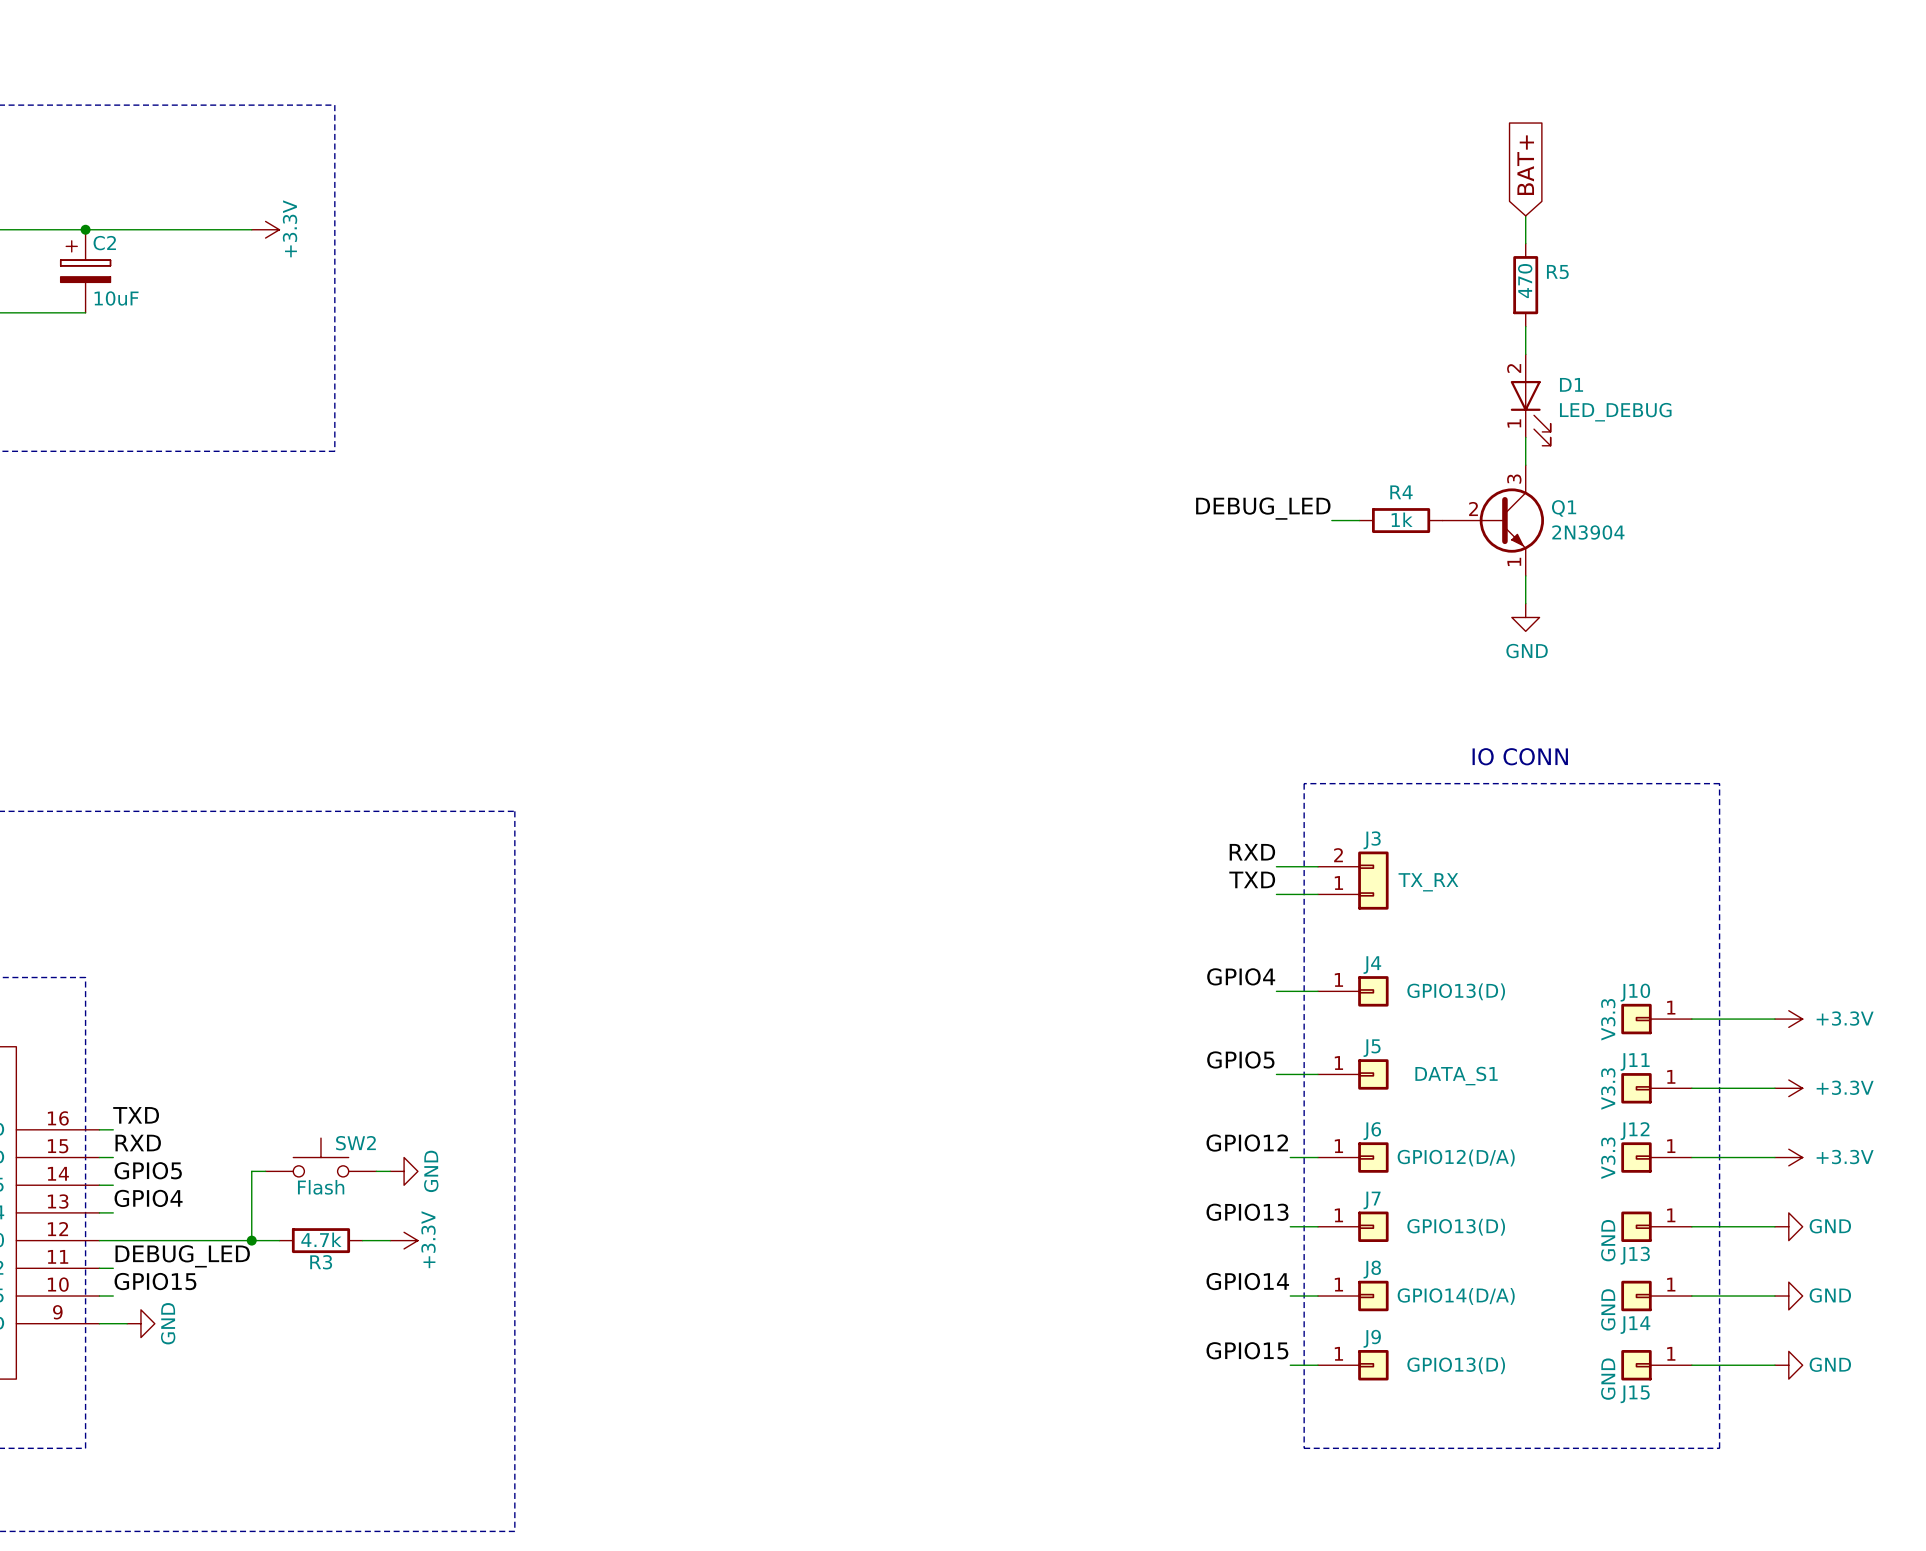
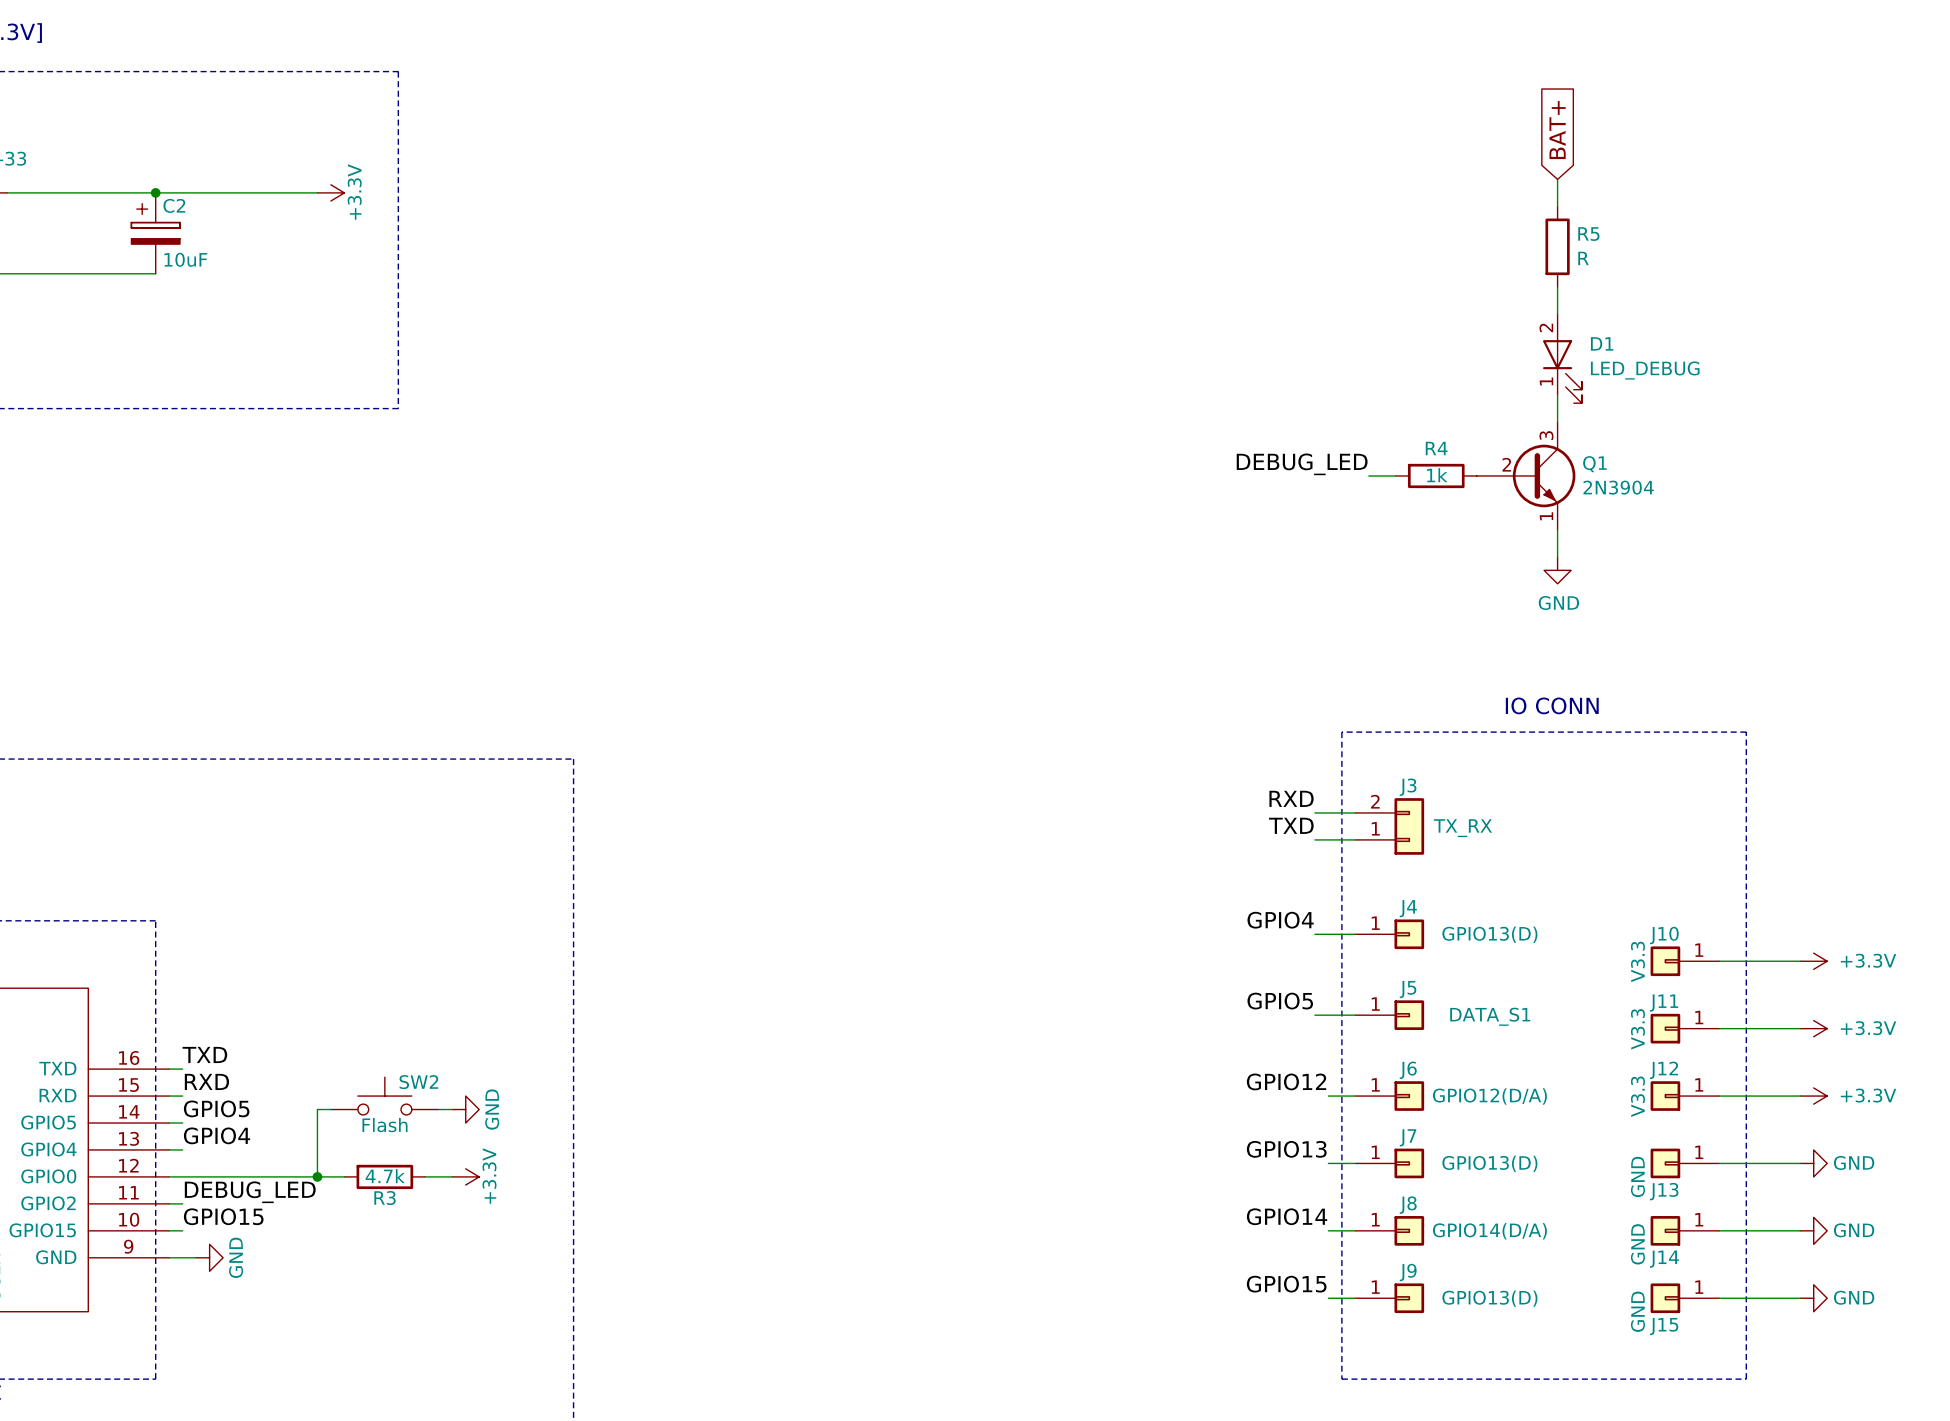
R5 value: 470 (1525, 281) -> R (1583, 258)

